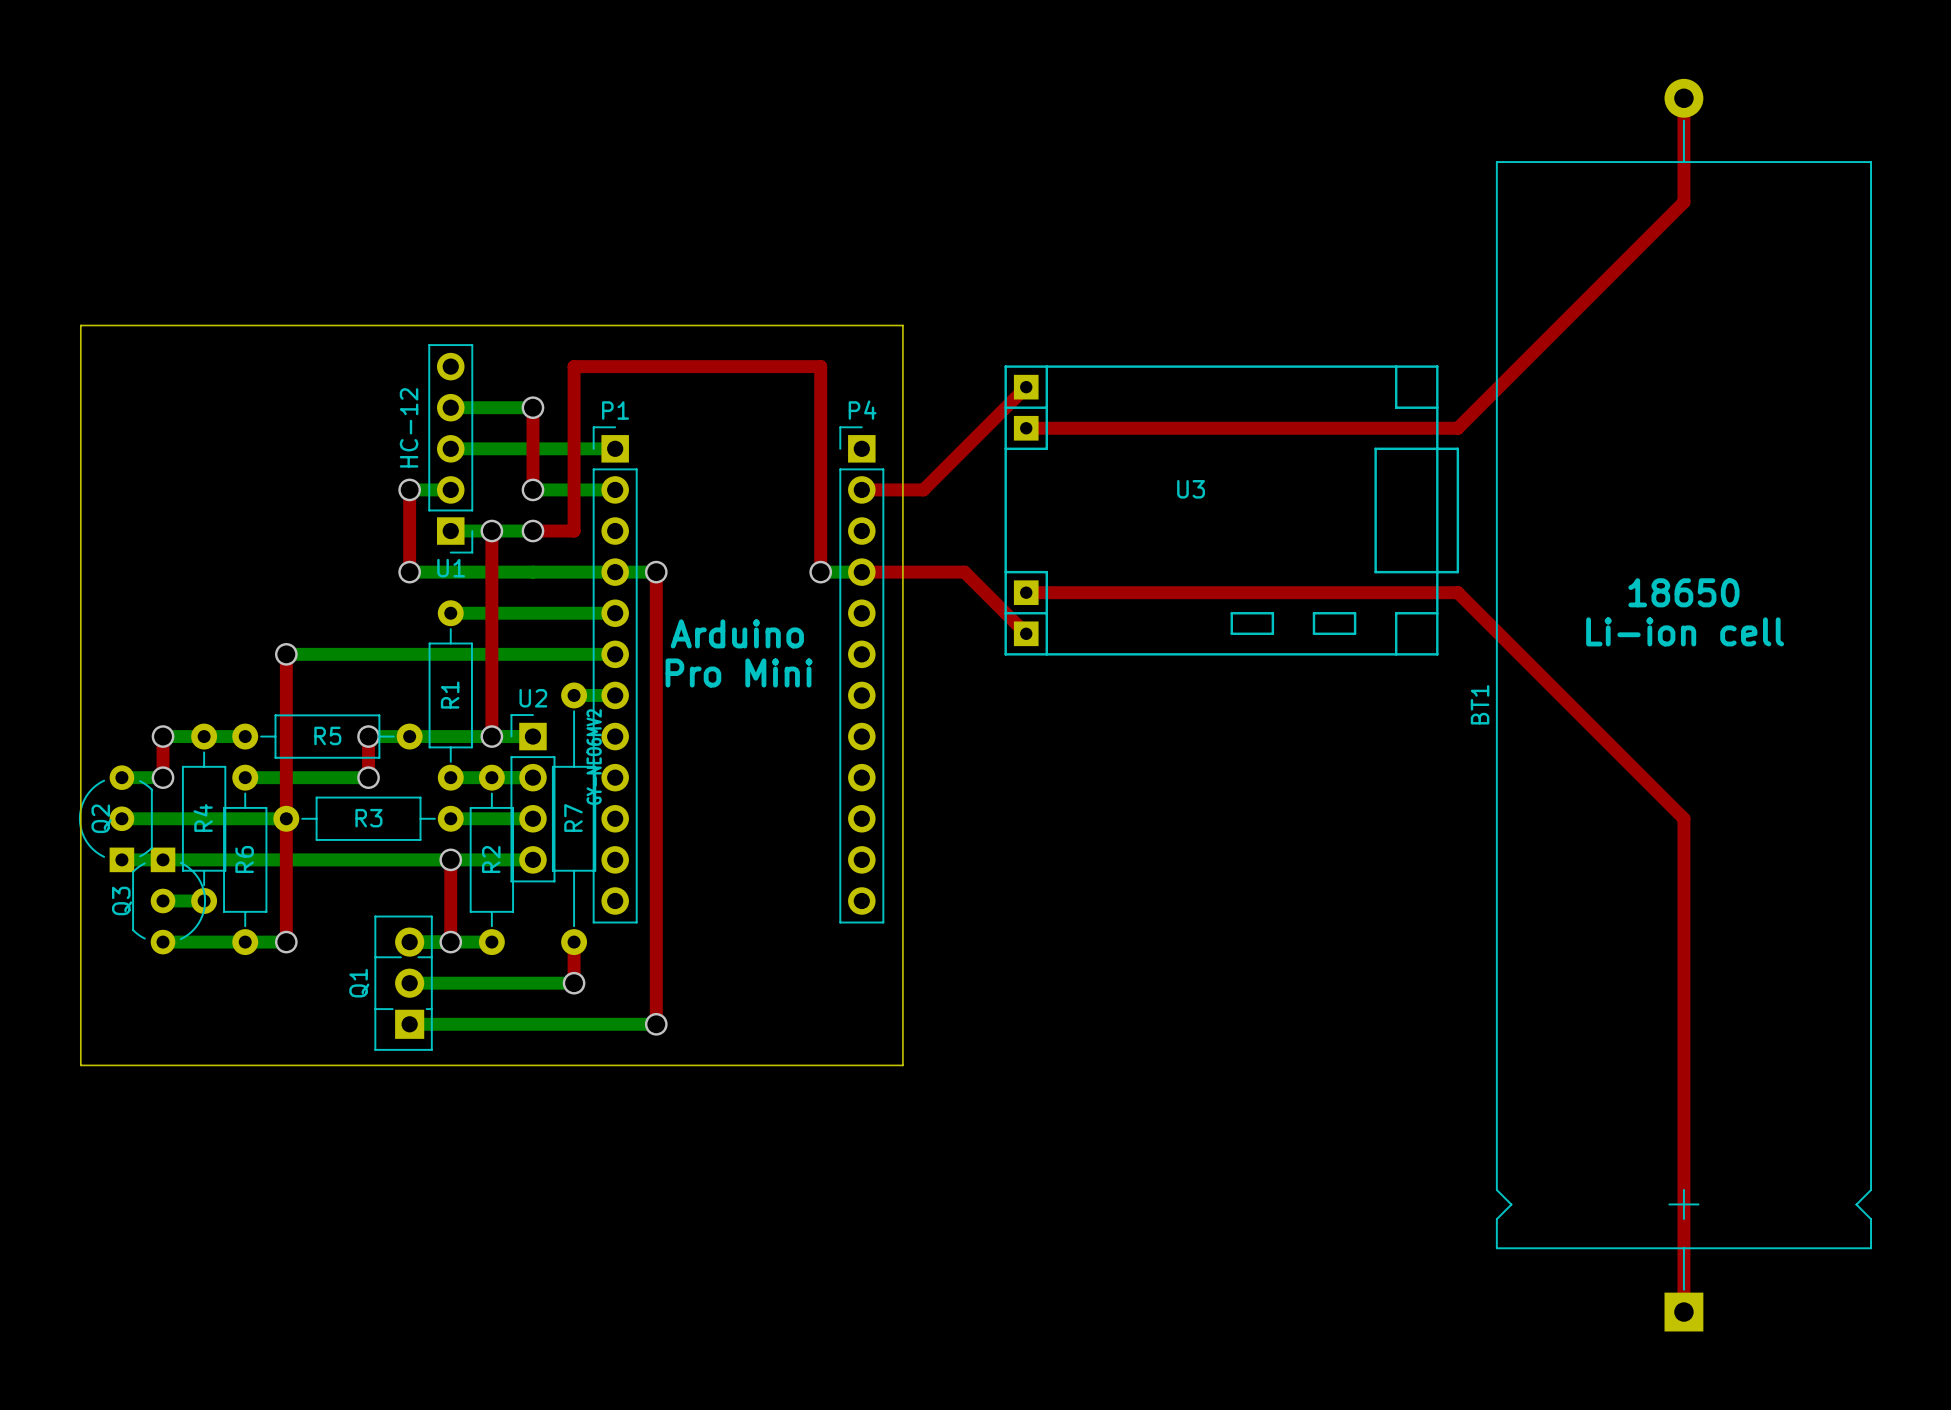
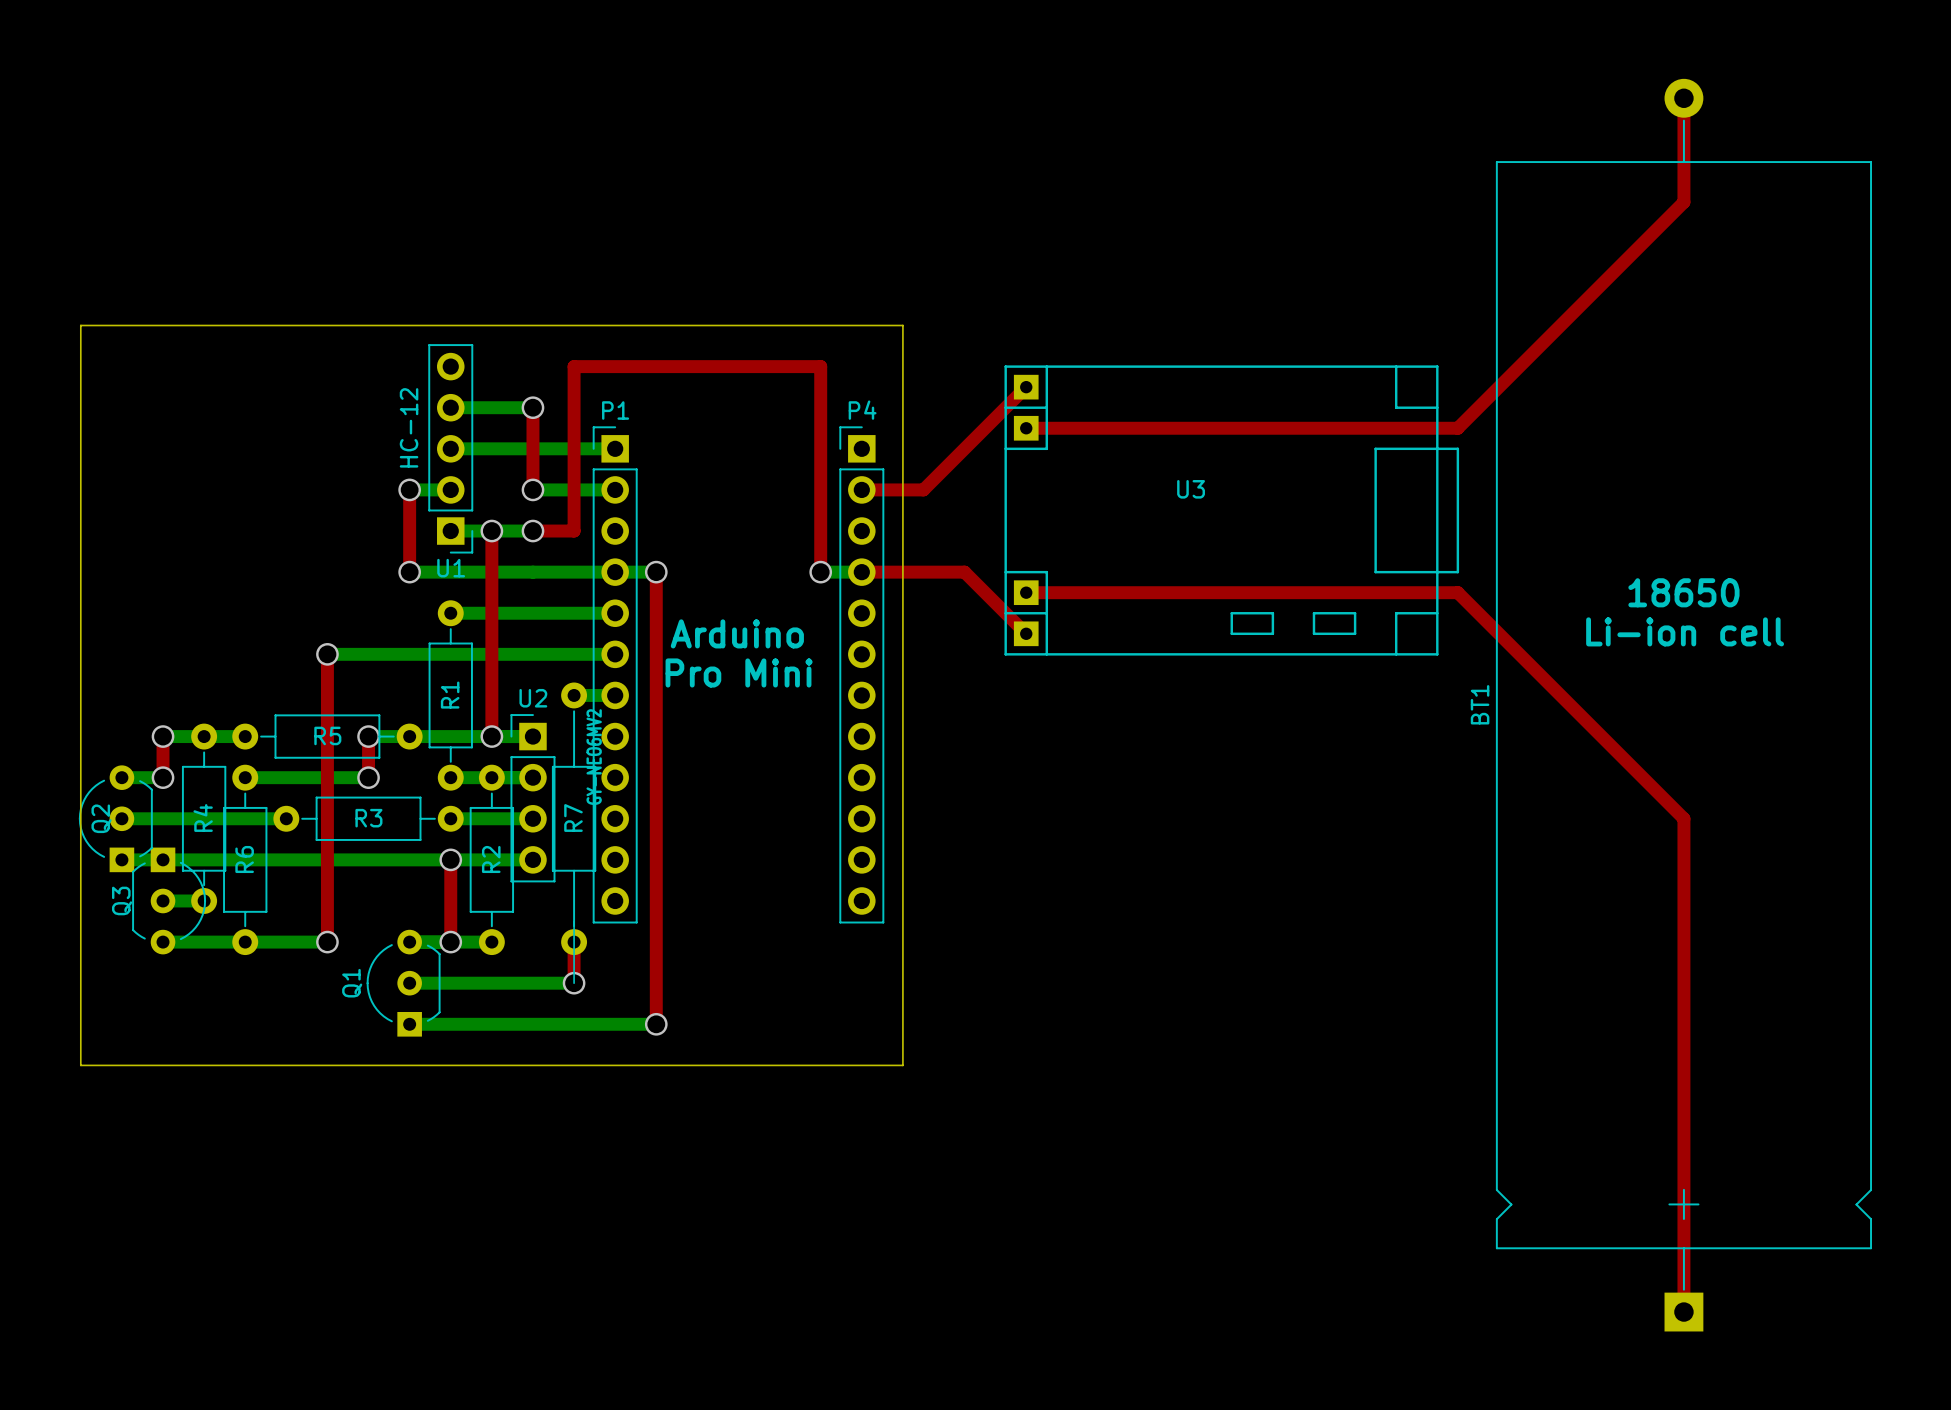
bottom track: (286, 654) (327, 654) -> (286, 942) (327, 942)
top track: (286, 654) (286, 942) -> (327, 654) (327, 942)
via position: (286, 654) -> (327, 654)
Q1 footprint: [374, 915, 433, 1051] -> [366, 929, 441, 1037]
line: none -> (574, 921) (574, 983)
via position: (286, 942) -> (327, 942)

